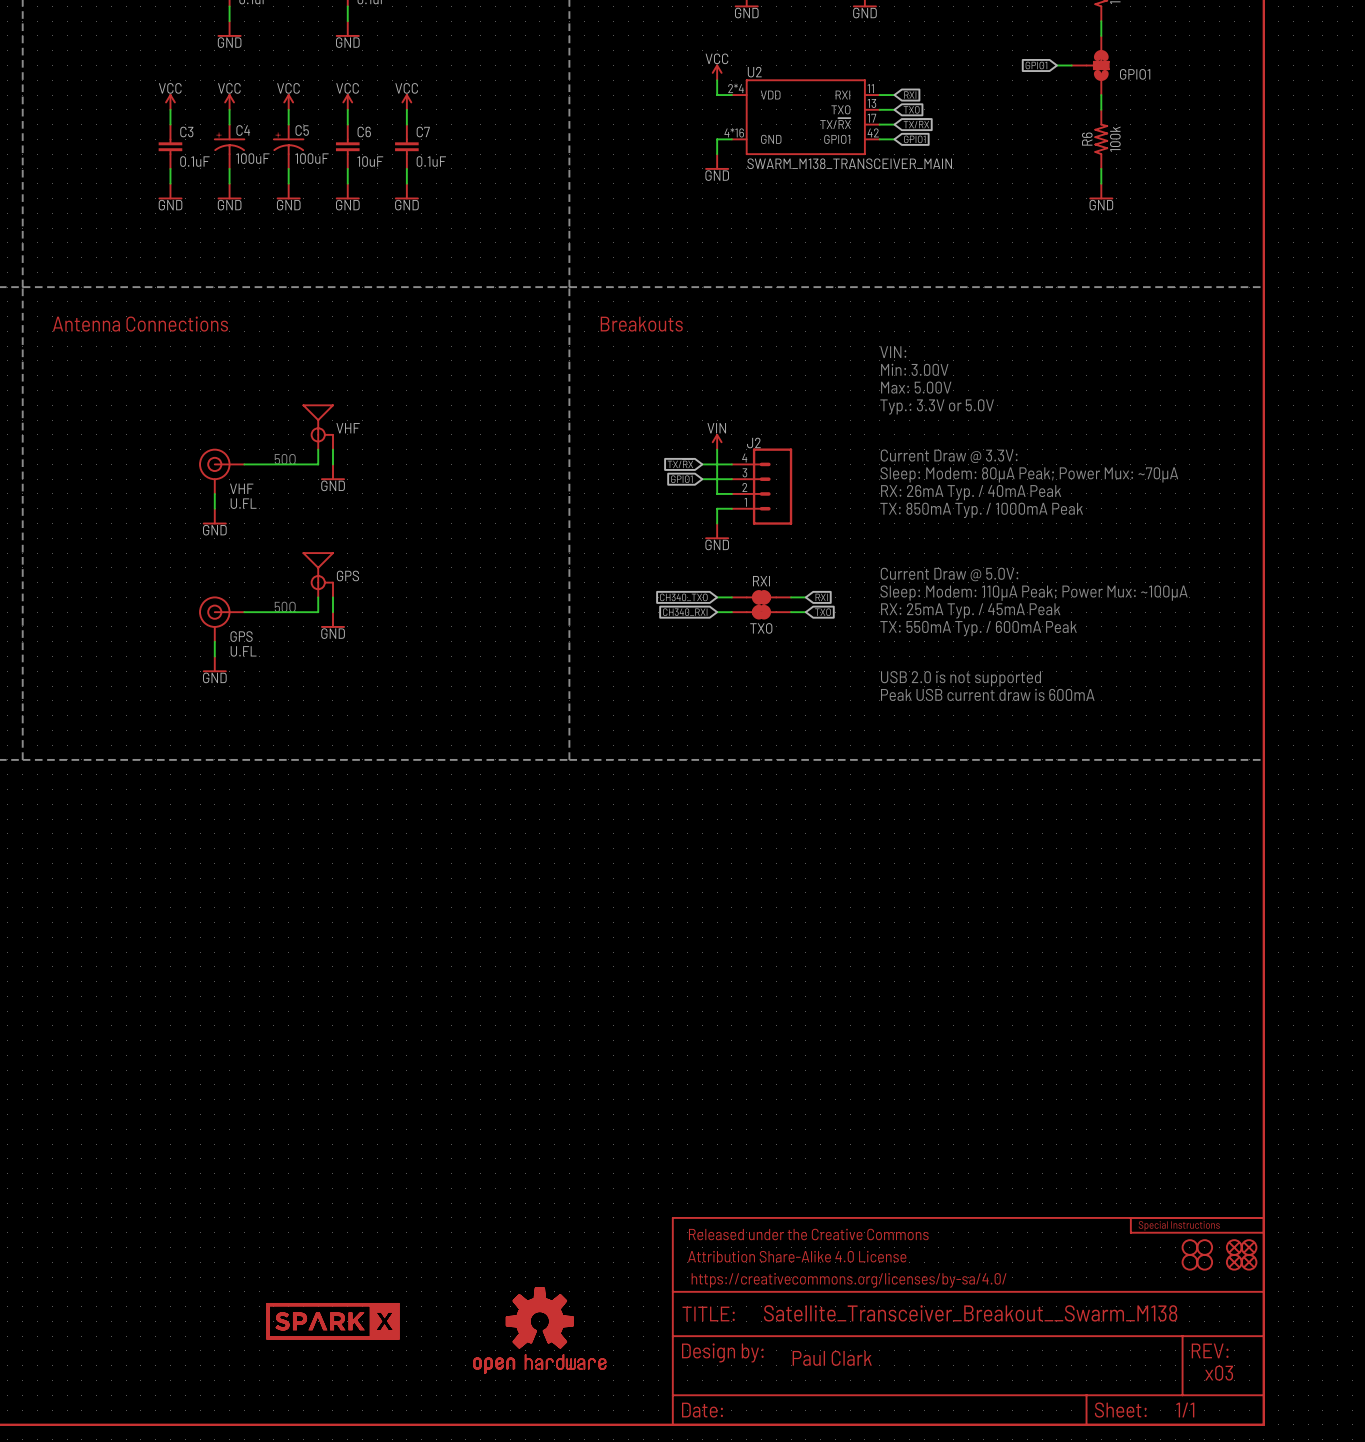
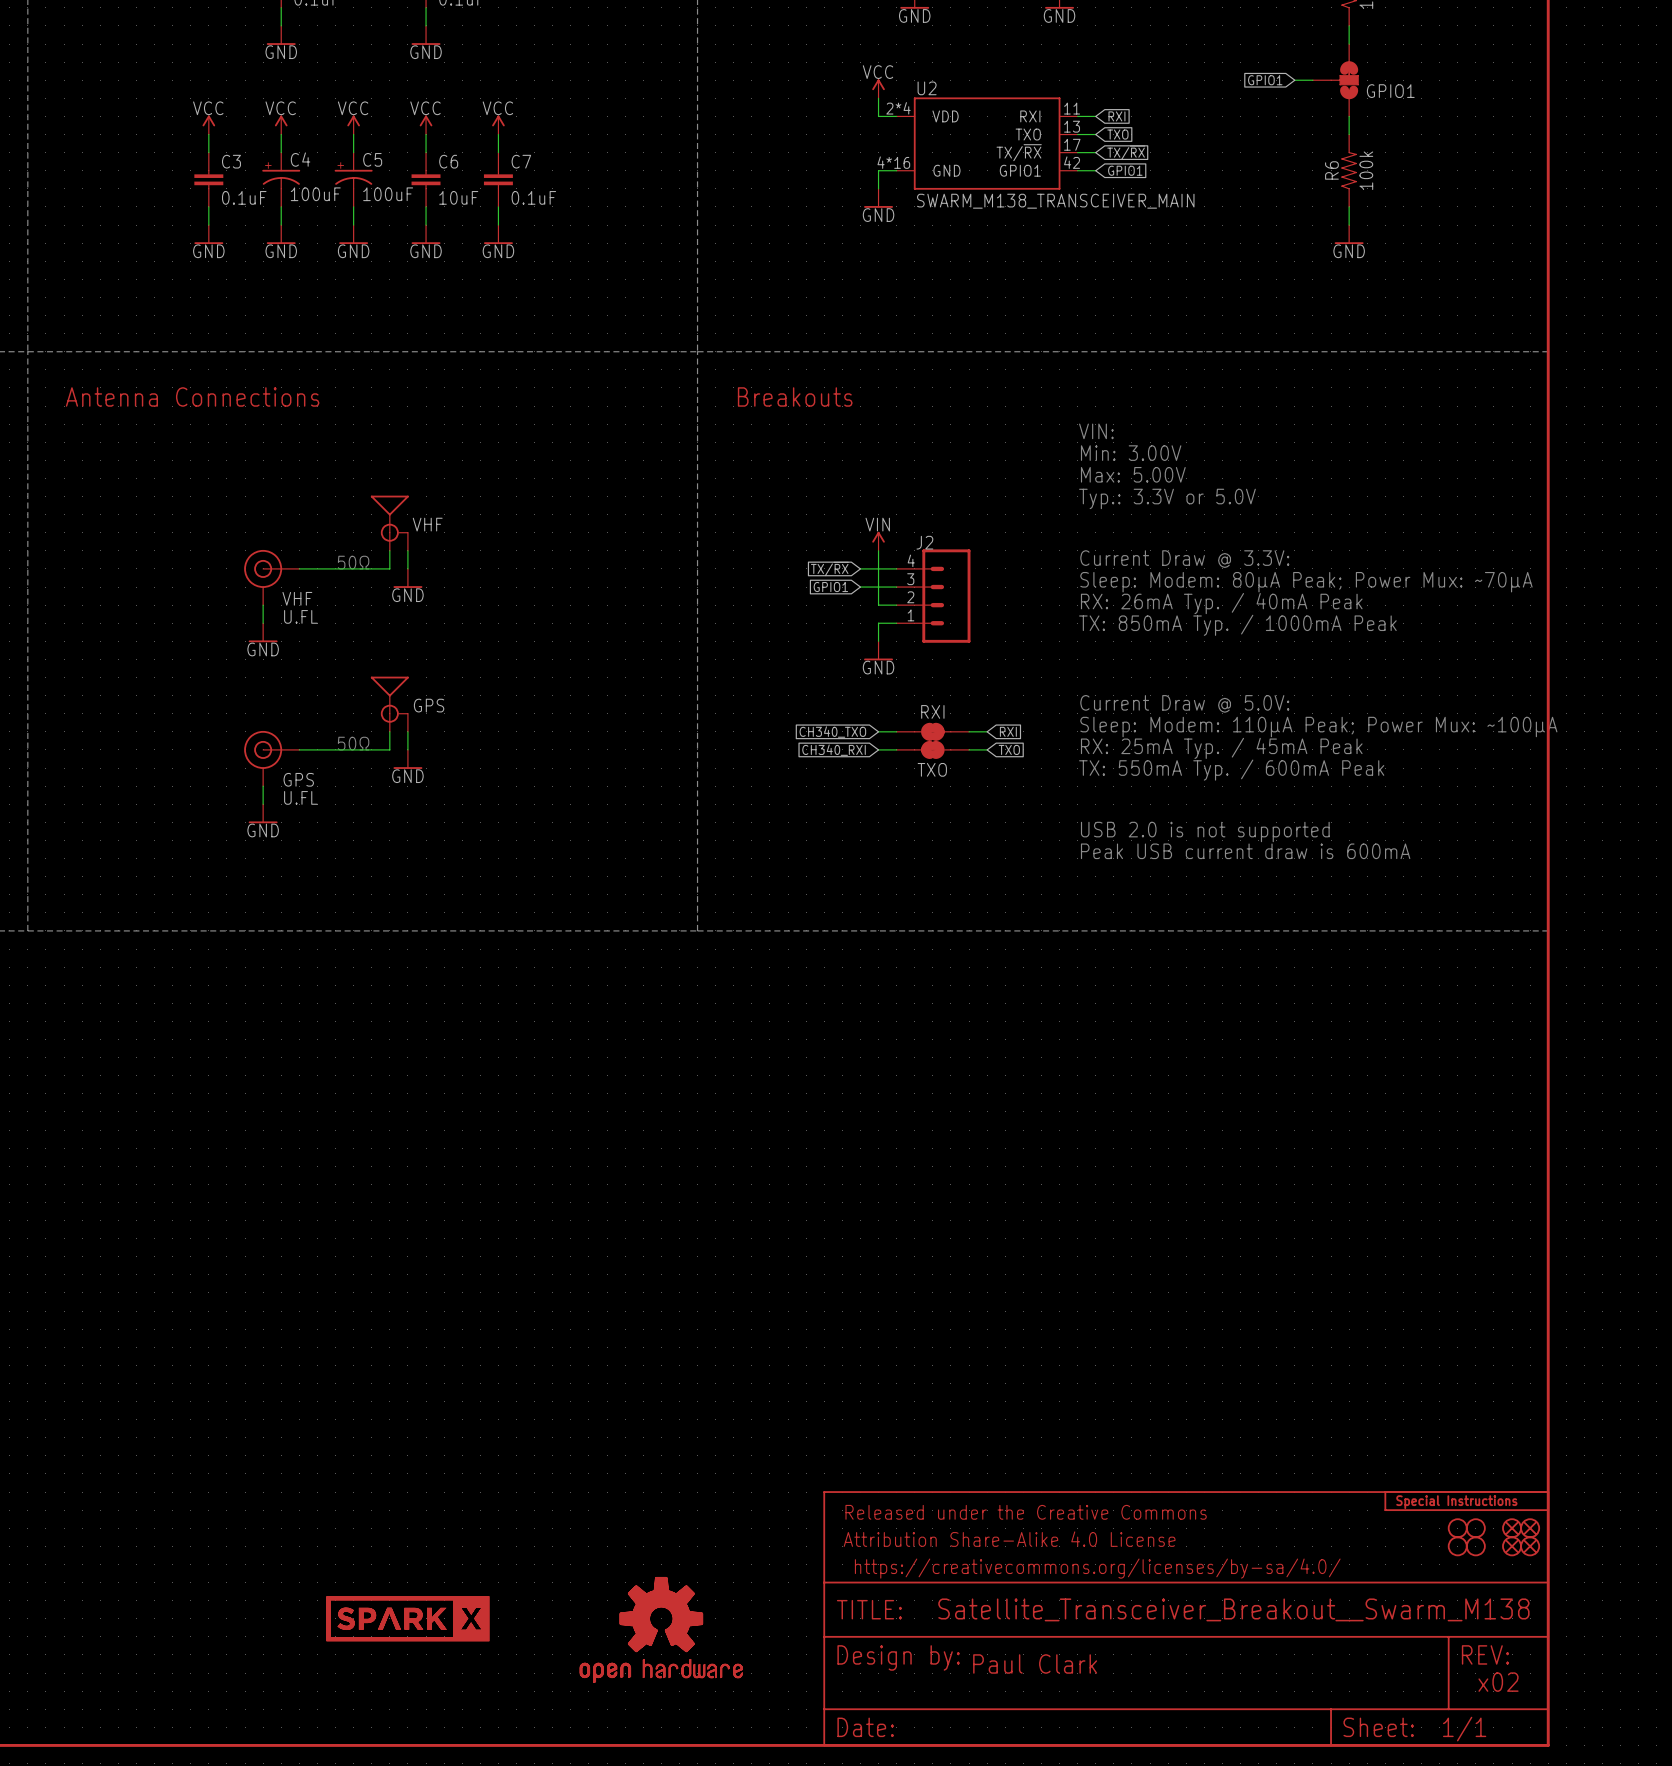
text: x03 (1219, 1373) -> x02 (1498, 1682)

